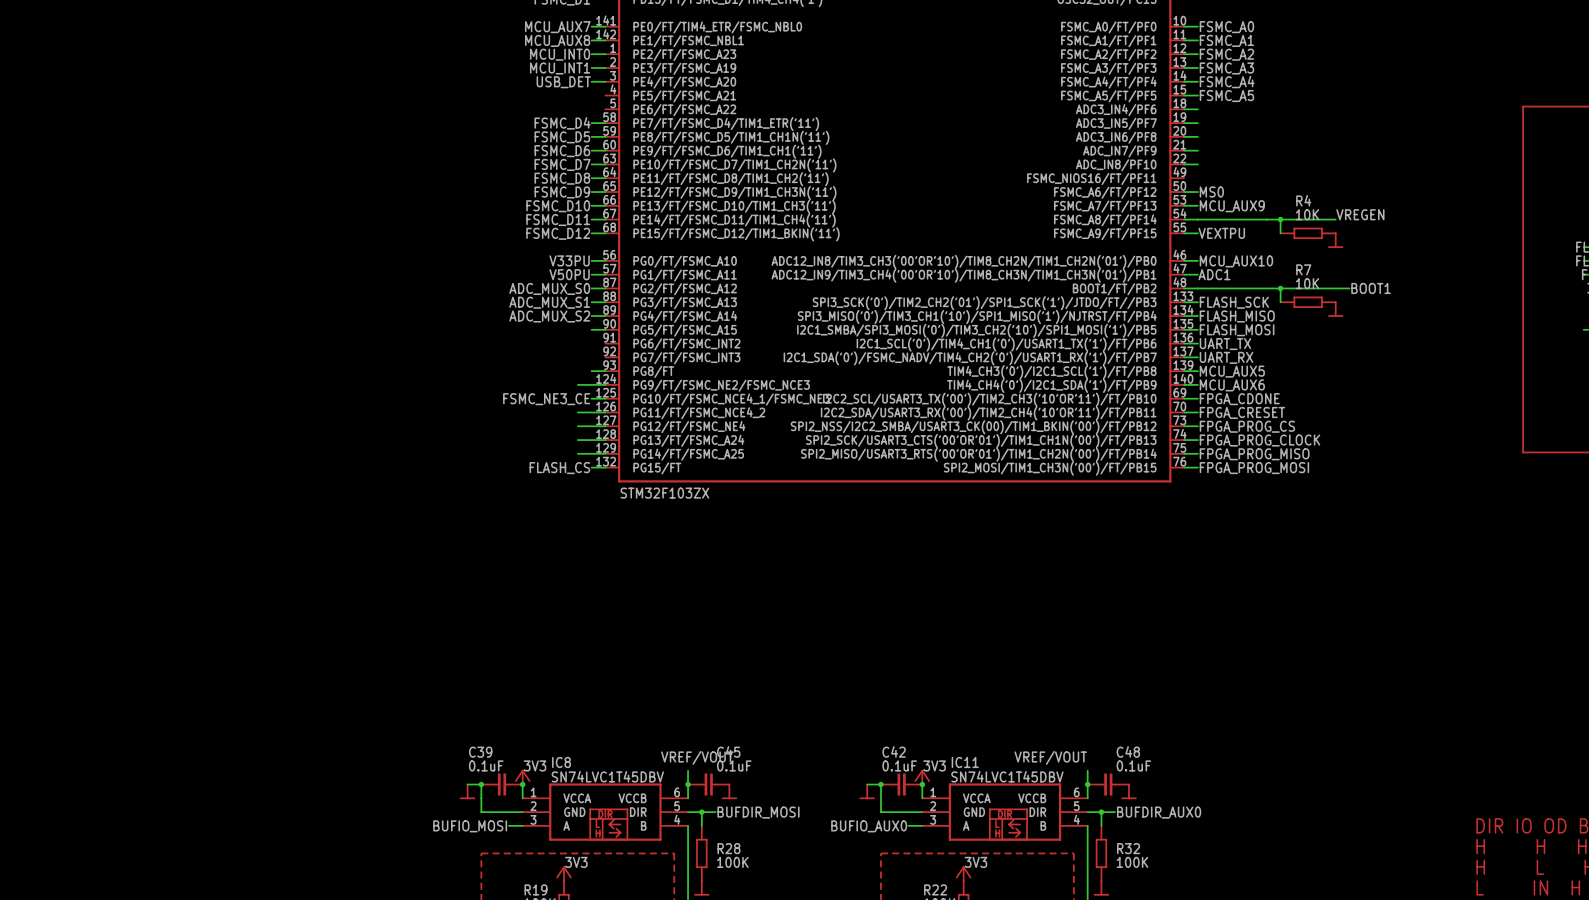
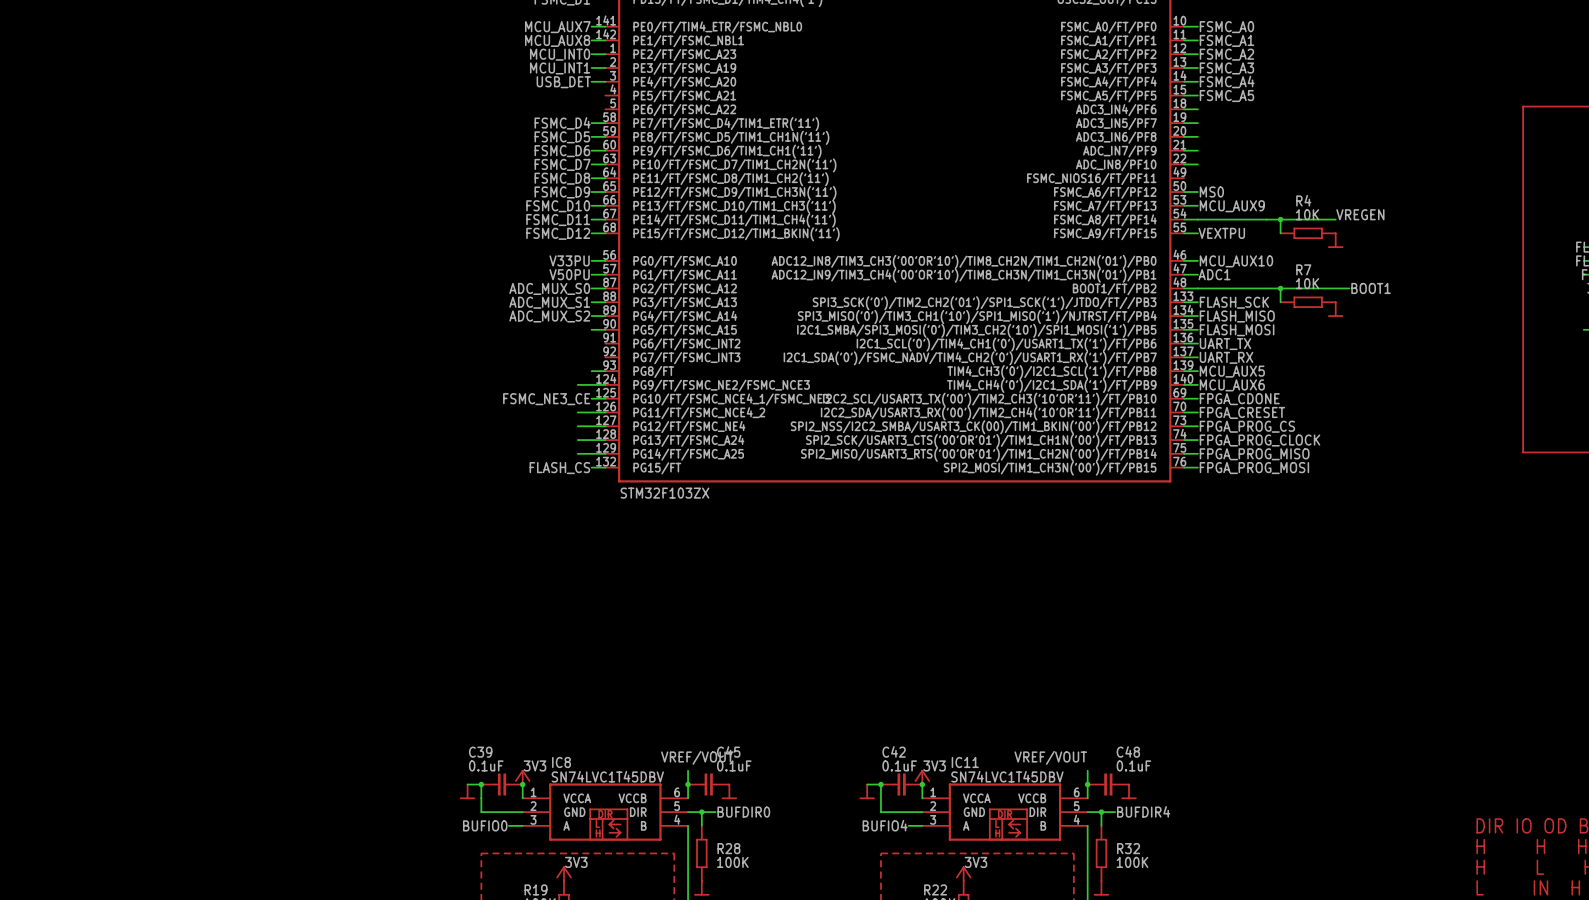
label: BUFDIR_MOSI (758, 812) -> BUFDIR0 (743, 812)
label: BUFDIR_AUX0 (1159, 812) -> BUFDIR4 (1143, 811)
label: BUFIO_MOSI (470, 826) -> BUFIO0 (485, 825)
label: BUFIO_AUX0 (869, 826) -> BUFIO4 (885, 825)

